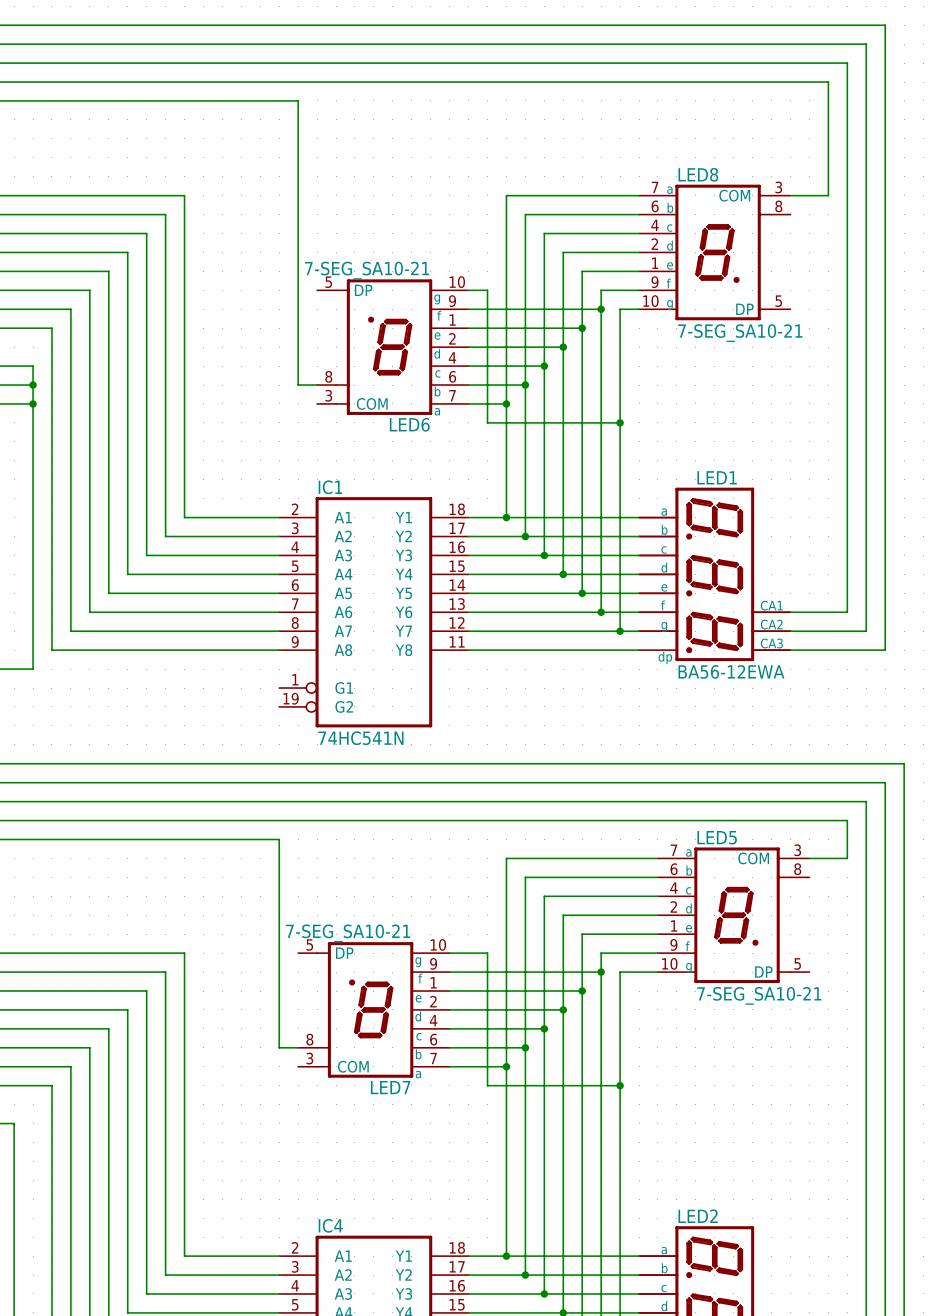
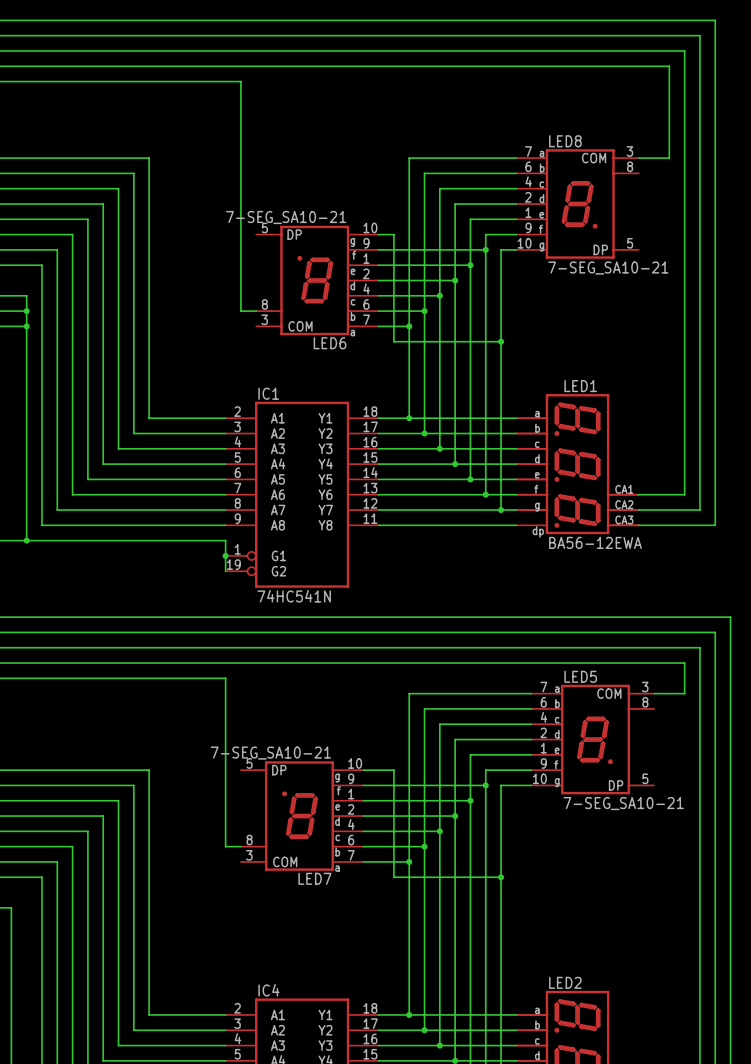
wire: none -> (26, 540) (225, 540) (225, 571)
junction: none -> (26, 540)
junction: none -> (225, 555)

